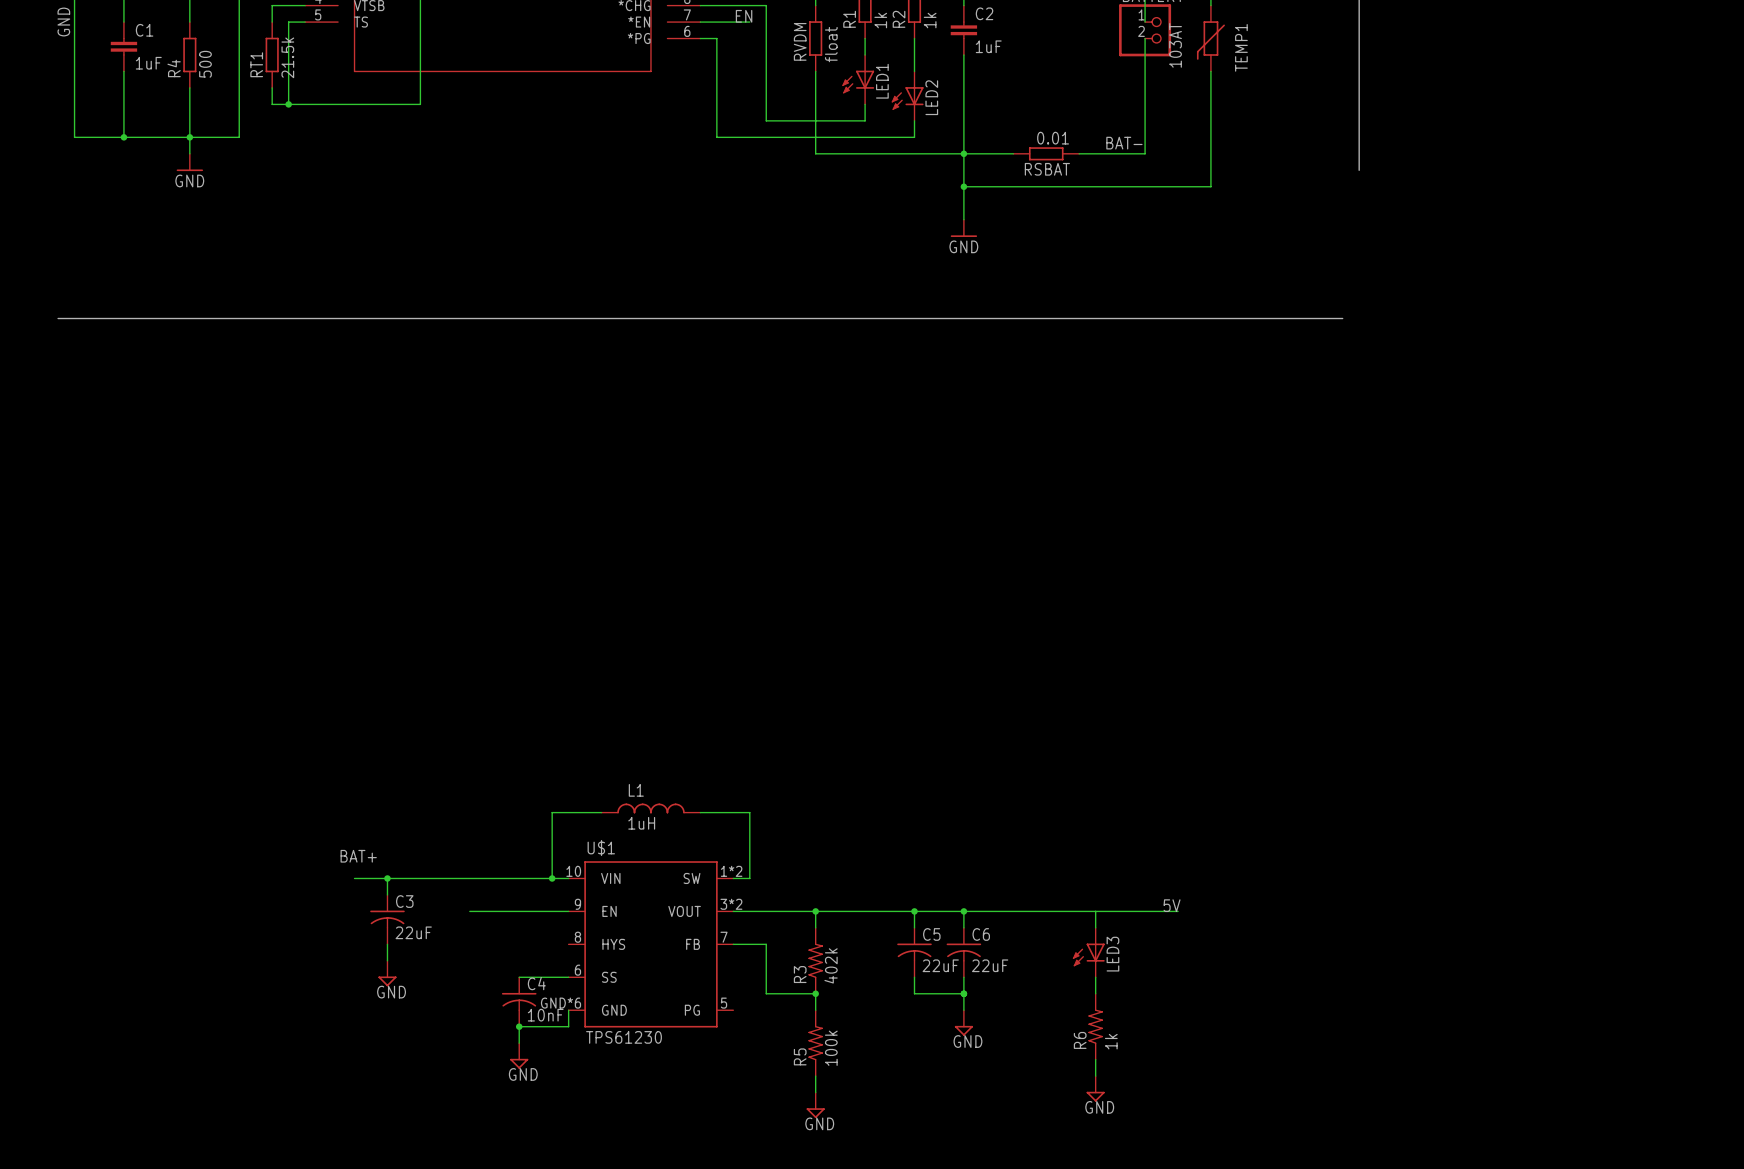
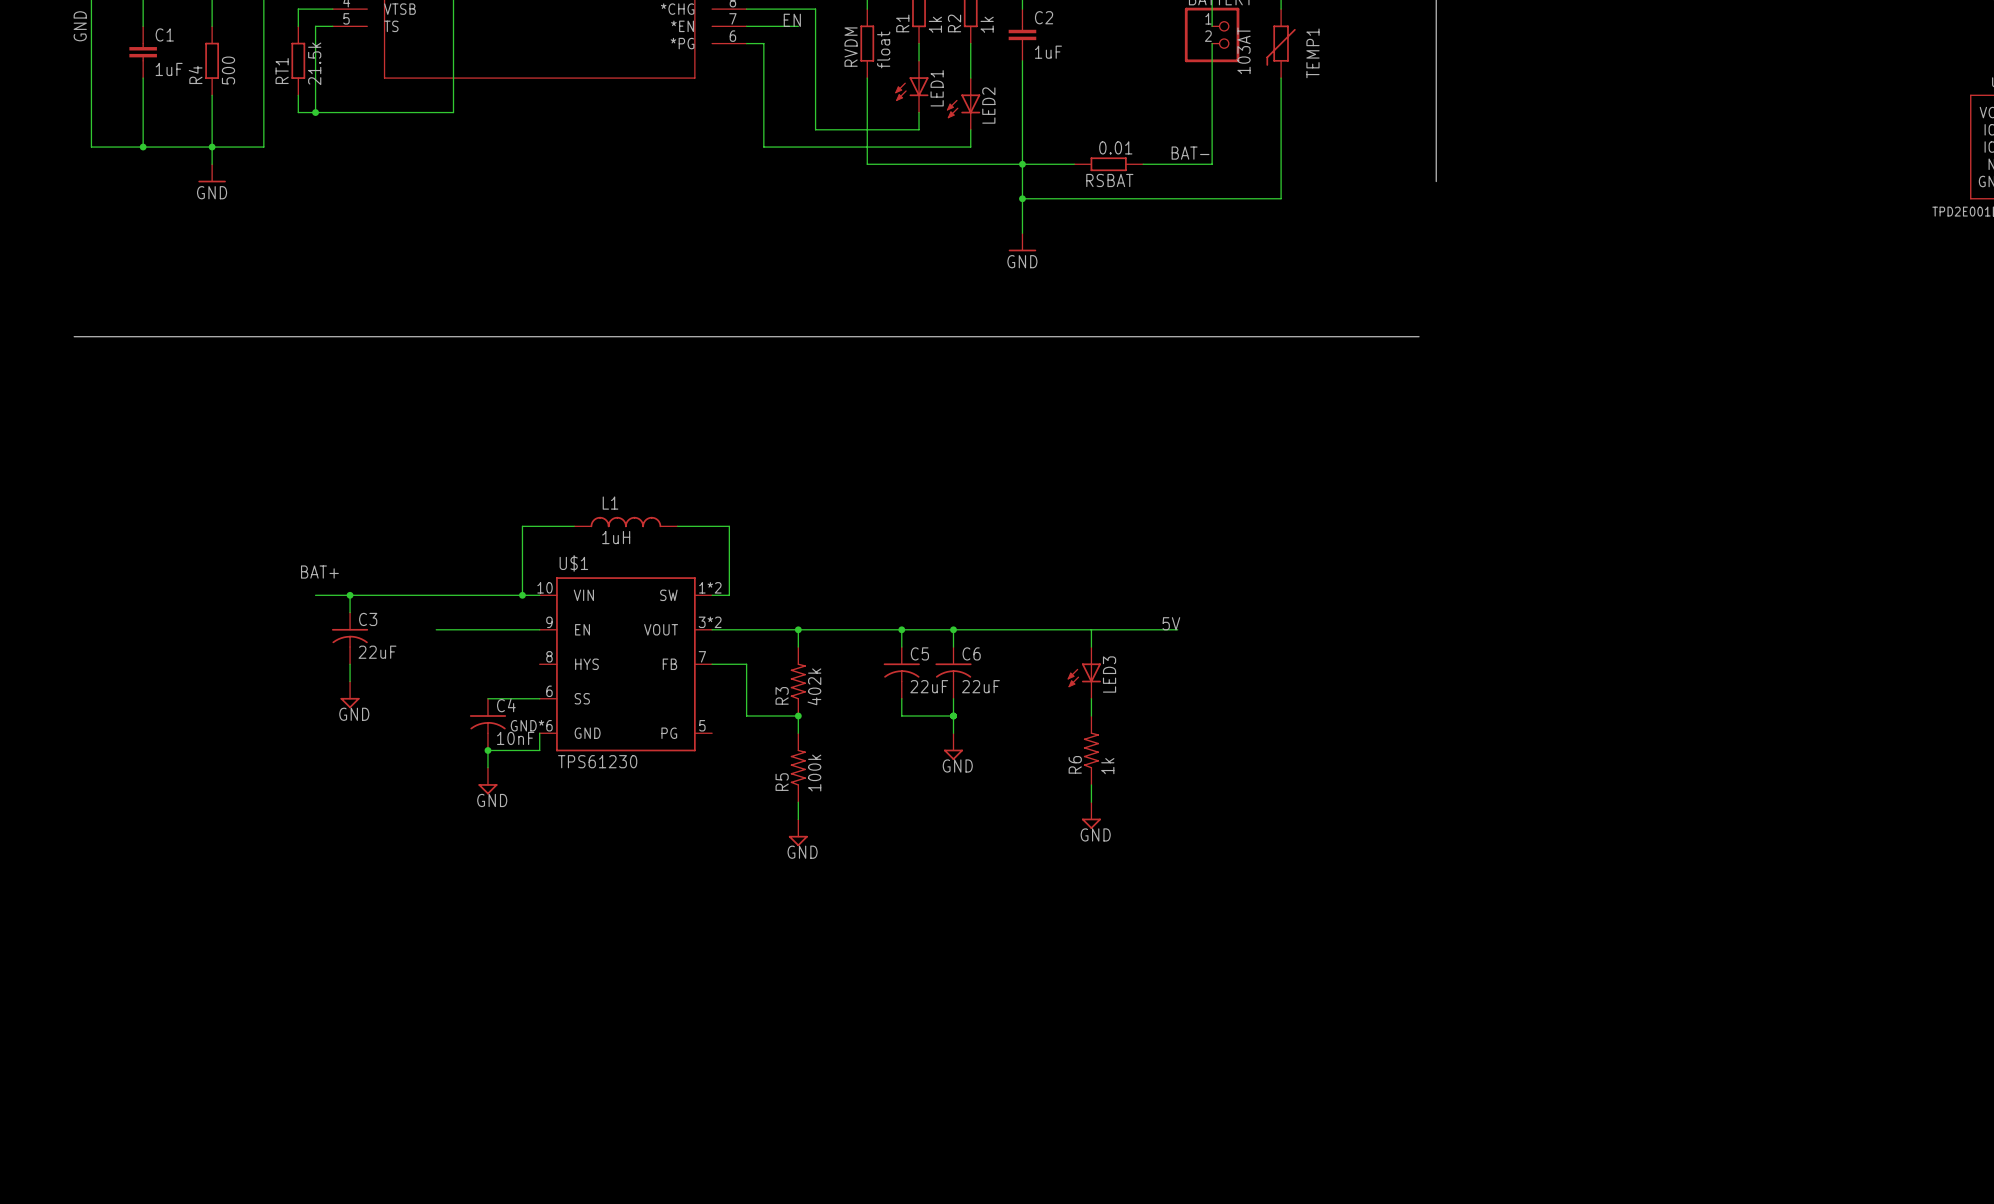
wire: none -> (574, 526) (522, 526) (522, 595)
wire: none -> (677, 526) (729, 526) (729, 595) (712, 595)
label: none -> BAT+ (319, 572)
wire: none -> (315, 595) (539, 595)
wire: none -> (350, 595) (350, 612)
junction: none -> (350, 595)
junction: none -> (522, 595)
label: none -> 5V (1171, 623)
wire: none -> (436, 629) (539, 629)
wire: none -> (712, 629) (1177, 629)
wire: none -> (798, 629) (798, 647)
junction: none -> (798, 629)
wire: none -> (901, 629) (901, 647)
junction: none -> (901, 629)
wire: none -> (953, 629) (953, 647)
junction: none -> (953, 629)
wire: none -> (1091, 629) (1091, 647)
wire: none -> (350, 664) (350, 681)
wire: none -> (712, 664) (746, 664) (746, 716) (798, 716) (798, 733)
power symbol: none -> GND (350, 694)
wire: none -> (487, 698) (539, 698)
wire: none -> (901, 698) (901, 716) (953, 716)
wire: none -> (953, 698) (953, 733)
wire: none -> (1091, 698) (1091, 716)
junction: none -> (798, 716)
junction: none -> (953, 716)
wire: none -> (539, 733) (539, 750) (487, 750) (487, 767)
power symbol: none -> GND (953, 746)
junction: none -> (487, 750)
power symbol: none -> GND (487, 781)
wire: none -> (1091, 784) (1091, 802)
wire: none -> (798, 802) (798, 819)
power symbol: none -> GND (1091, 815)
power symbol: none -> GND (798, 832)
L1 position: (650, 808) -> (625, 522)
wire: (601, 812) (552, 812) (552, 878) -> none
wire: (700, 812) (749, 812) (749, 878) (733, 878) -> none
label: BAT+ (358, 856) -> none
wire: (354, 878) (568, 878) -> none
wire: (387, 878) (387, 894) -> none
junction: (387, 878) -> none
junction: (552, 878) -> none
label: 5V (1172, 905) -> none
wire: (469, 911) (568, 911) -> none
wire: (733, 911) (1178, 911) -> none
wire: (815, 911) (815, 927) -> none
junction: (815, 911) -> none
wire: (914, 911) (914, 927) -> none
junction: (914, 911) -> none
wire: (963, 911) (963, 927) -> none
junction: (963, 911) -> none
wire: (1095, 911) (1095, 927) -> none
C3 position: (387, 919) -> (350, 638)
wire: (387, 944) (387, 960) -> none
U$1 position: (650, 944) -> (625, 664)
wire: (733, 944) (766, 944) (766, 993) (815, 993) (815, 1010) -> none
C5 position: (914, 952) -> (901, 672)
C6 position: (963, 952) -> (953, 672)
LED3 position: (1088, 952) -> (1084, 672)
R3 position: (815, 960) -> (798, 681)
power symbol: GND (387, 973) -> none
wire: (519, 977) (568, 977) -> none
wire: (914, 977) (914, 993) (963, 993) -> none
wire: (963, 977) (963, 1010) -> none
wire: (1095, 977) (1095, 993) -> none
junction: (815, 993) -> none
junction: (963, 993) -> none
C4 position: (519, 1002) -> (487, 724)
wire: (568, 1010) (568, 1026) (519, 1026) (519, 1043) -> none
power symbol: GND (963, 1023) -> none
junction: (519, 1026) -> none
R6 position: (1095, 1026) -> (1091, 750)
R5 position: (815, 1043) -> (798, 767)
power symbol: GND (519, 1055) -> none
wire: (1095, 1059) (1095, 1076) -> none
wire: (815, 1076) (815, 1092) -> none
power symbol: GND (1095, 1088) -> none
power symbol: GND (815, 1105) -> none

